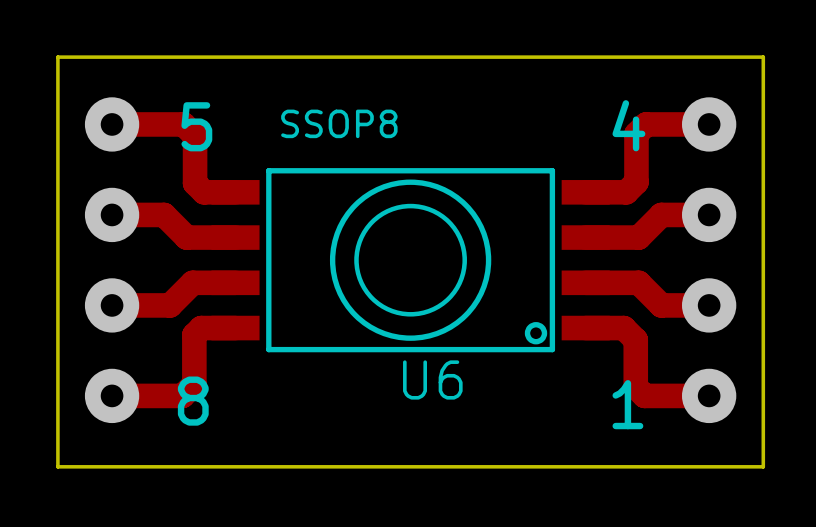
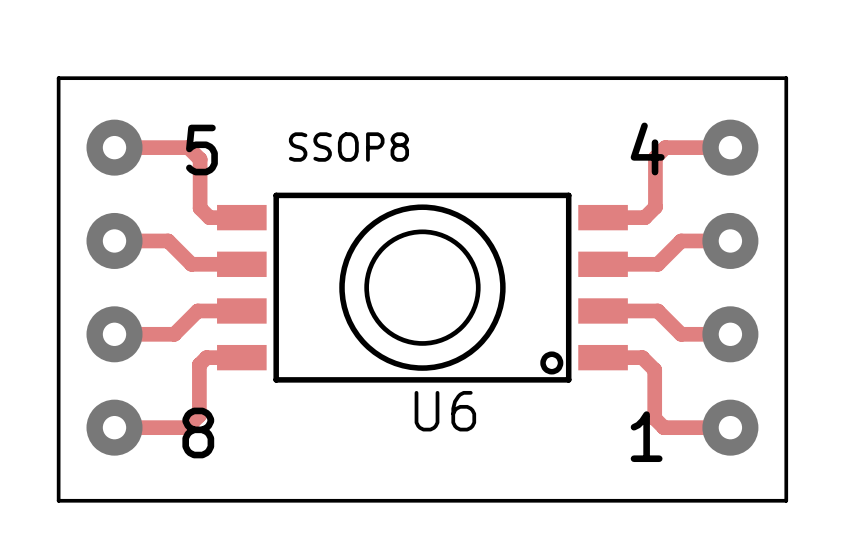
track width: thick (112, 124) (183, 124) (195, 135) (195, 183) (204, 192) (235, 192) -> thin (114, 147) (188, 147) (200, 159) (200, 208) (209, 217) (241, 217)
track width: thick (709, 124) (646, 124) (636, 134) (636, 182) (626, 192) (585, 192) -> thin (730, 147) (665, 147) (655, 157) (655, 207) (644, 217) (603, 217)
track width: thick (112, 214) (164, 214) (186, 237) (235, 237) -> thin (114, 240) (168, 240) (191, 264) (241, 264)
track width: thick (709, 214) (661, 214) (638, 237) (585, 237) -> thin (730, 240) (681, 240) (657, 264) (603, 264)
track width: thick (235, 282) (192, 282) (170, 305) (112, 305) -> thin (241, 310) (197, 310) (174, 334) (114, 334)
track width: thick (585, 282) (638, 282) (661, 305) (709, 305) -> thin (603, 310) (657, 310) (681, 334) (730, 334)
track width: thick (235, 328) (201, 328) (194, 335) (194, 384) (182, 395) (112, 395) -> thin (241, 357) (206, 357) (199, 364) (199, 415) (187, 427) (114, 427)
track width: thick (585, 328) (623, 328) (635, 339) (635, 387) (644, 395) (709, 395) -> thin (603, 357) (642, 357) (654, 369) (654, 418) (663, 427) (730, 427)

